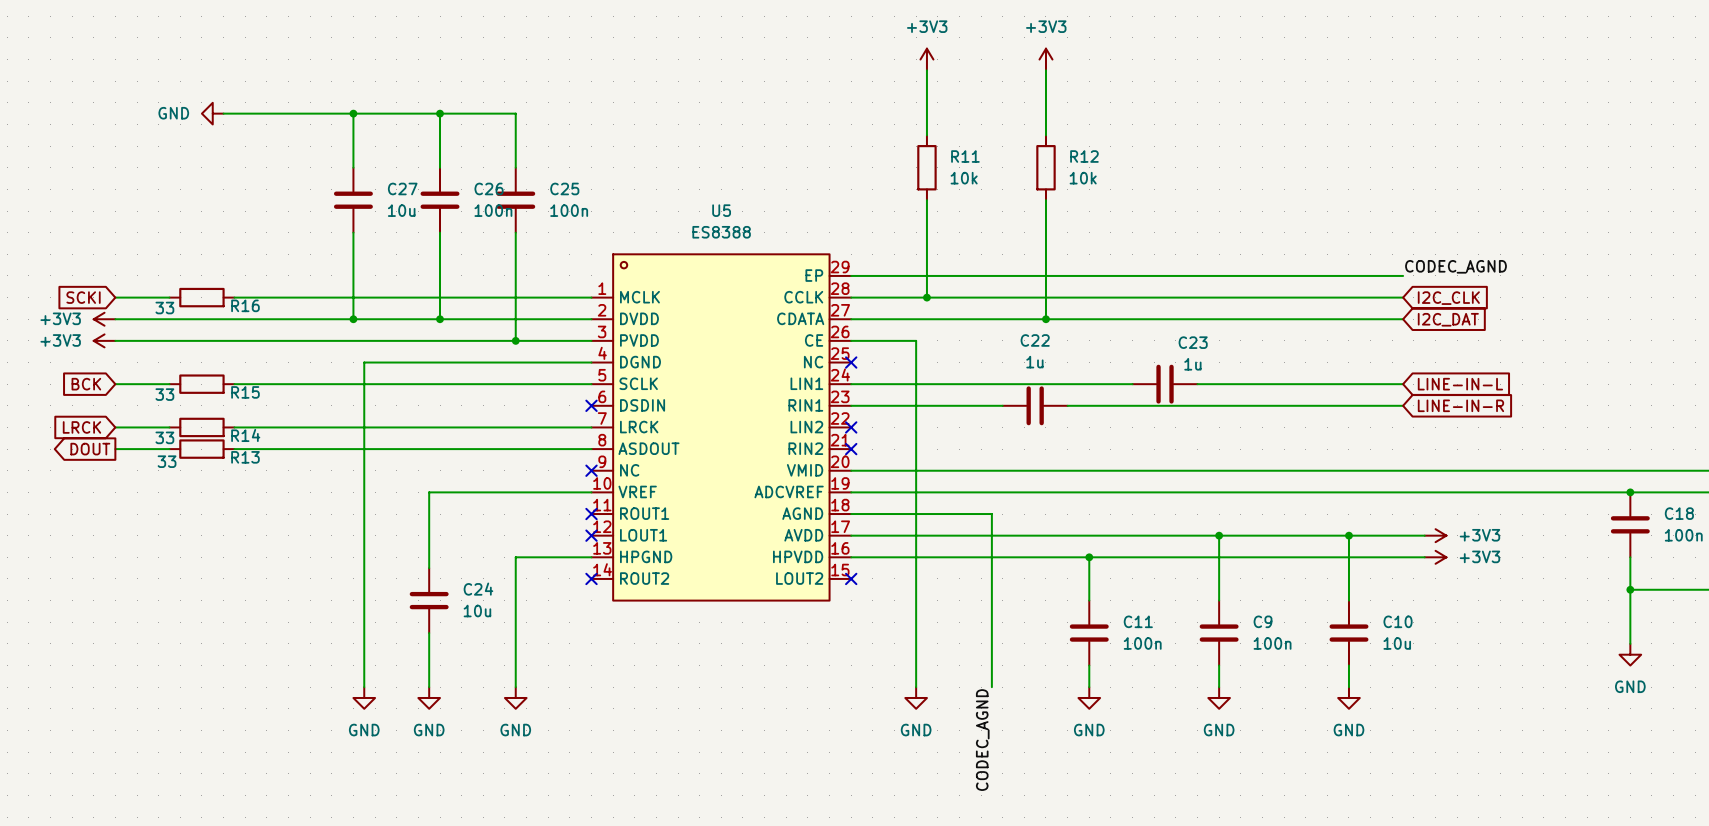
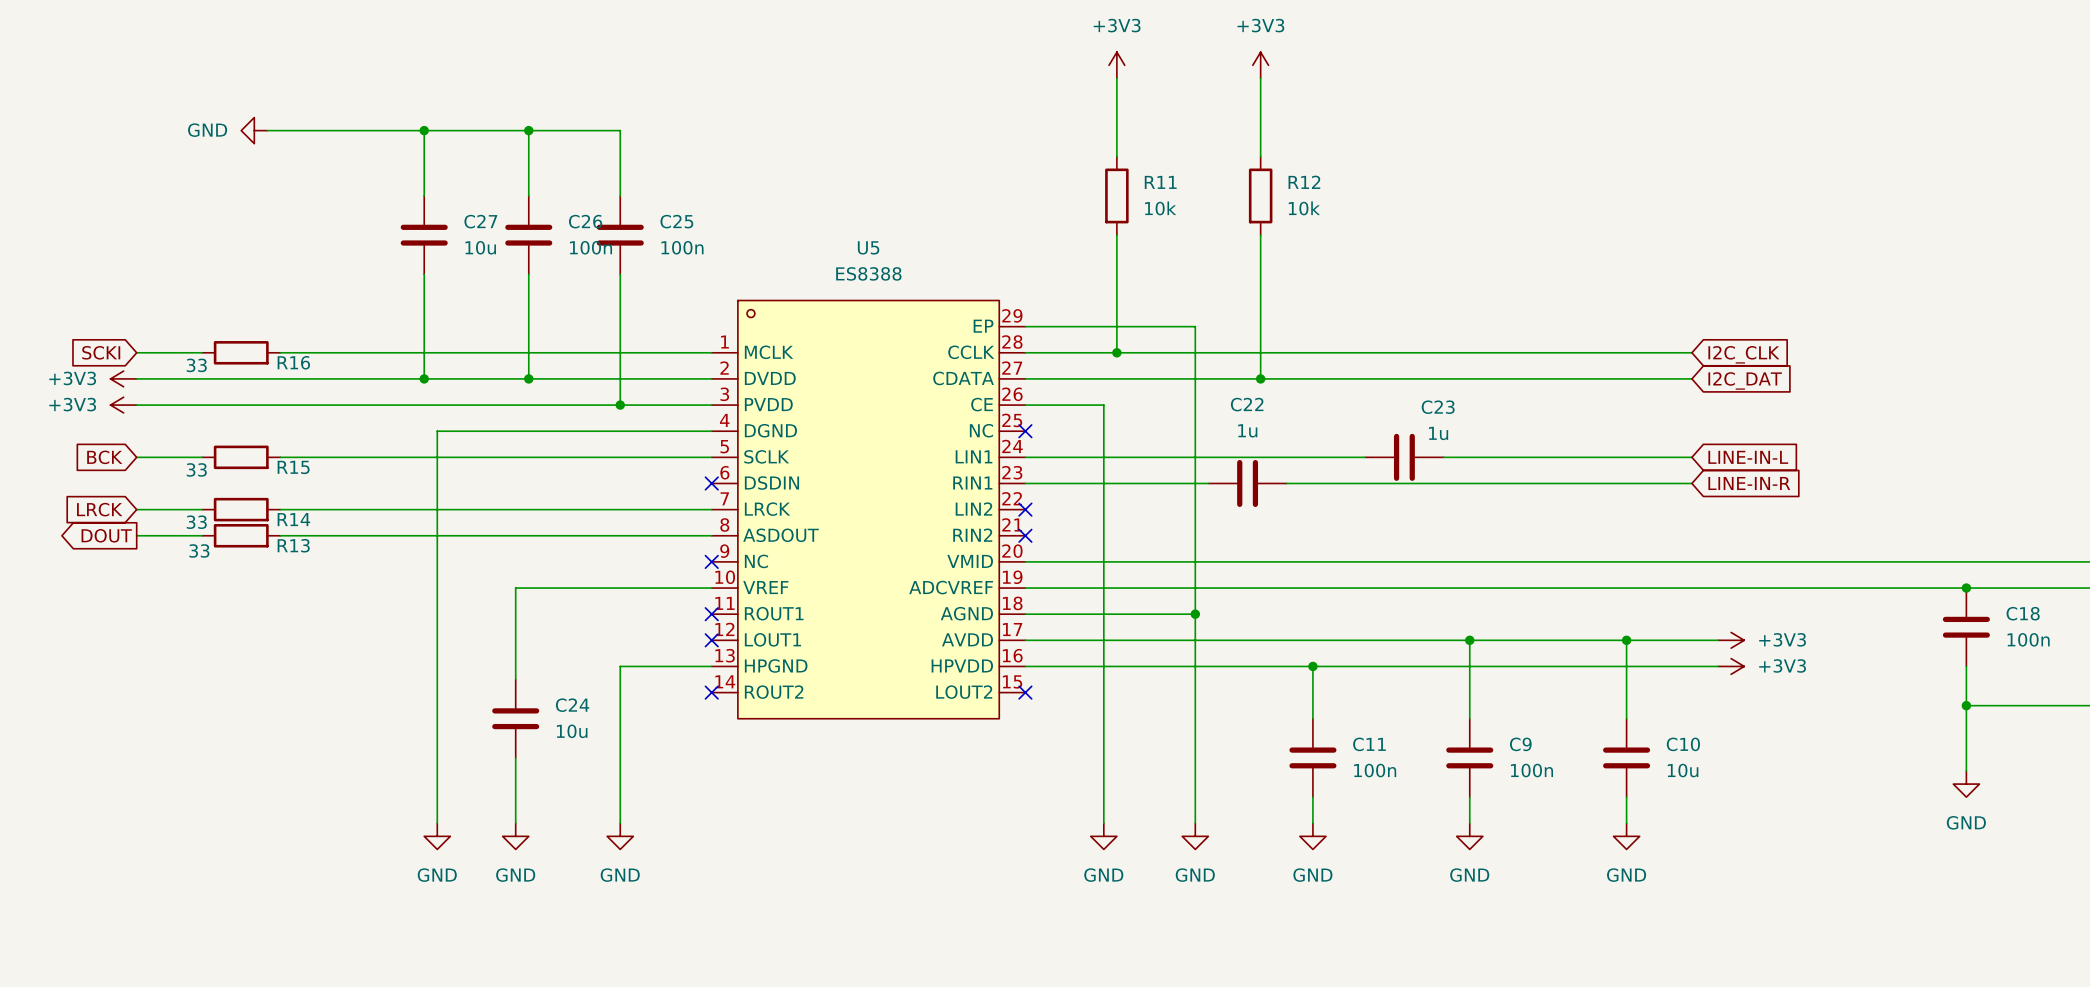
label: CODEC_AGND (1455, 266) -> none
wire: (991, 275) (1403, 275) -> (1195, 326) (1195, 614)
junction: none -> (1195, 614)
power symbol: none -> GND (1195, 836)
label: CODEC_AGND (982, 740) -> none

